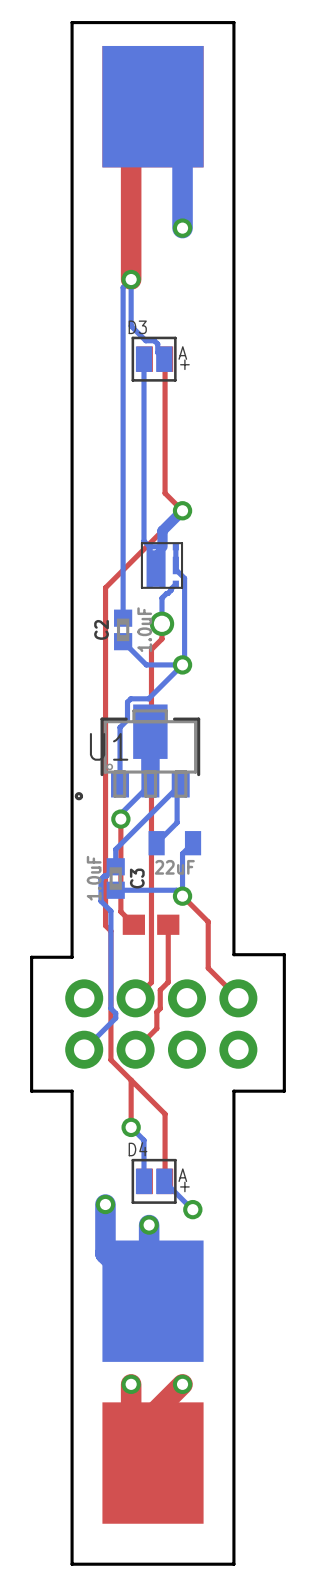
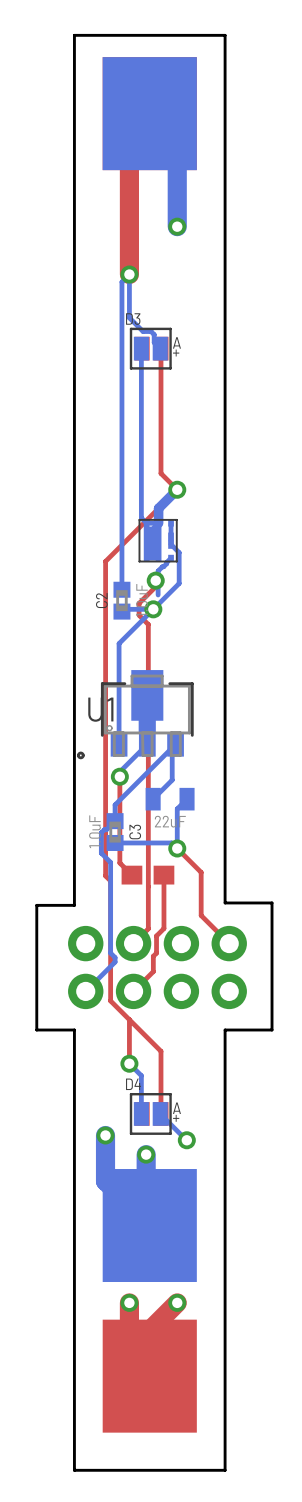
via: none -> (155, 580)
bottom track: (184, 611) (184, 662) (148, 698) (130, 698) (127, 702) (127, 719) (120, 727) -> (179, 583) (119, 643) (119, 691)
top track: (161, 623) (161, 639) (151, 649) (151, 655) -> (155, 580) (155, 586) (139, 603) (139, 615) (148, 624)
via: (161, 623) -> none
via: none -> (153, 609)
bottom track: (123, 641) (146, 664) (182, 664) -> (121, 611) (124, 609) (153, 609)
via: (182, 664) -> none

